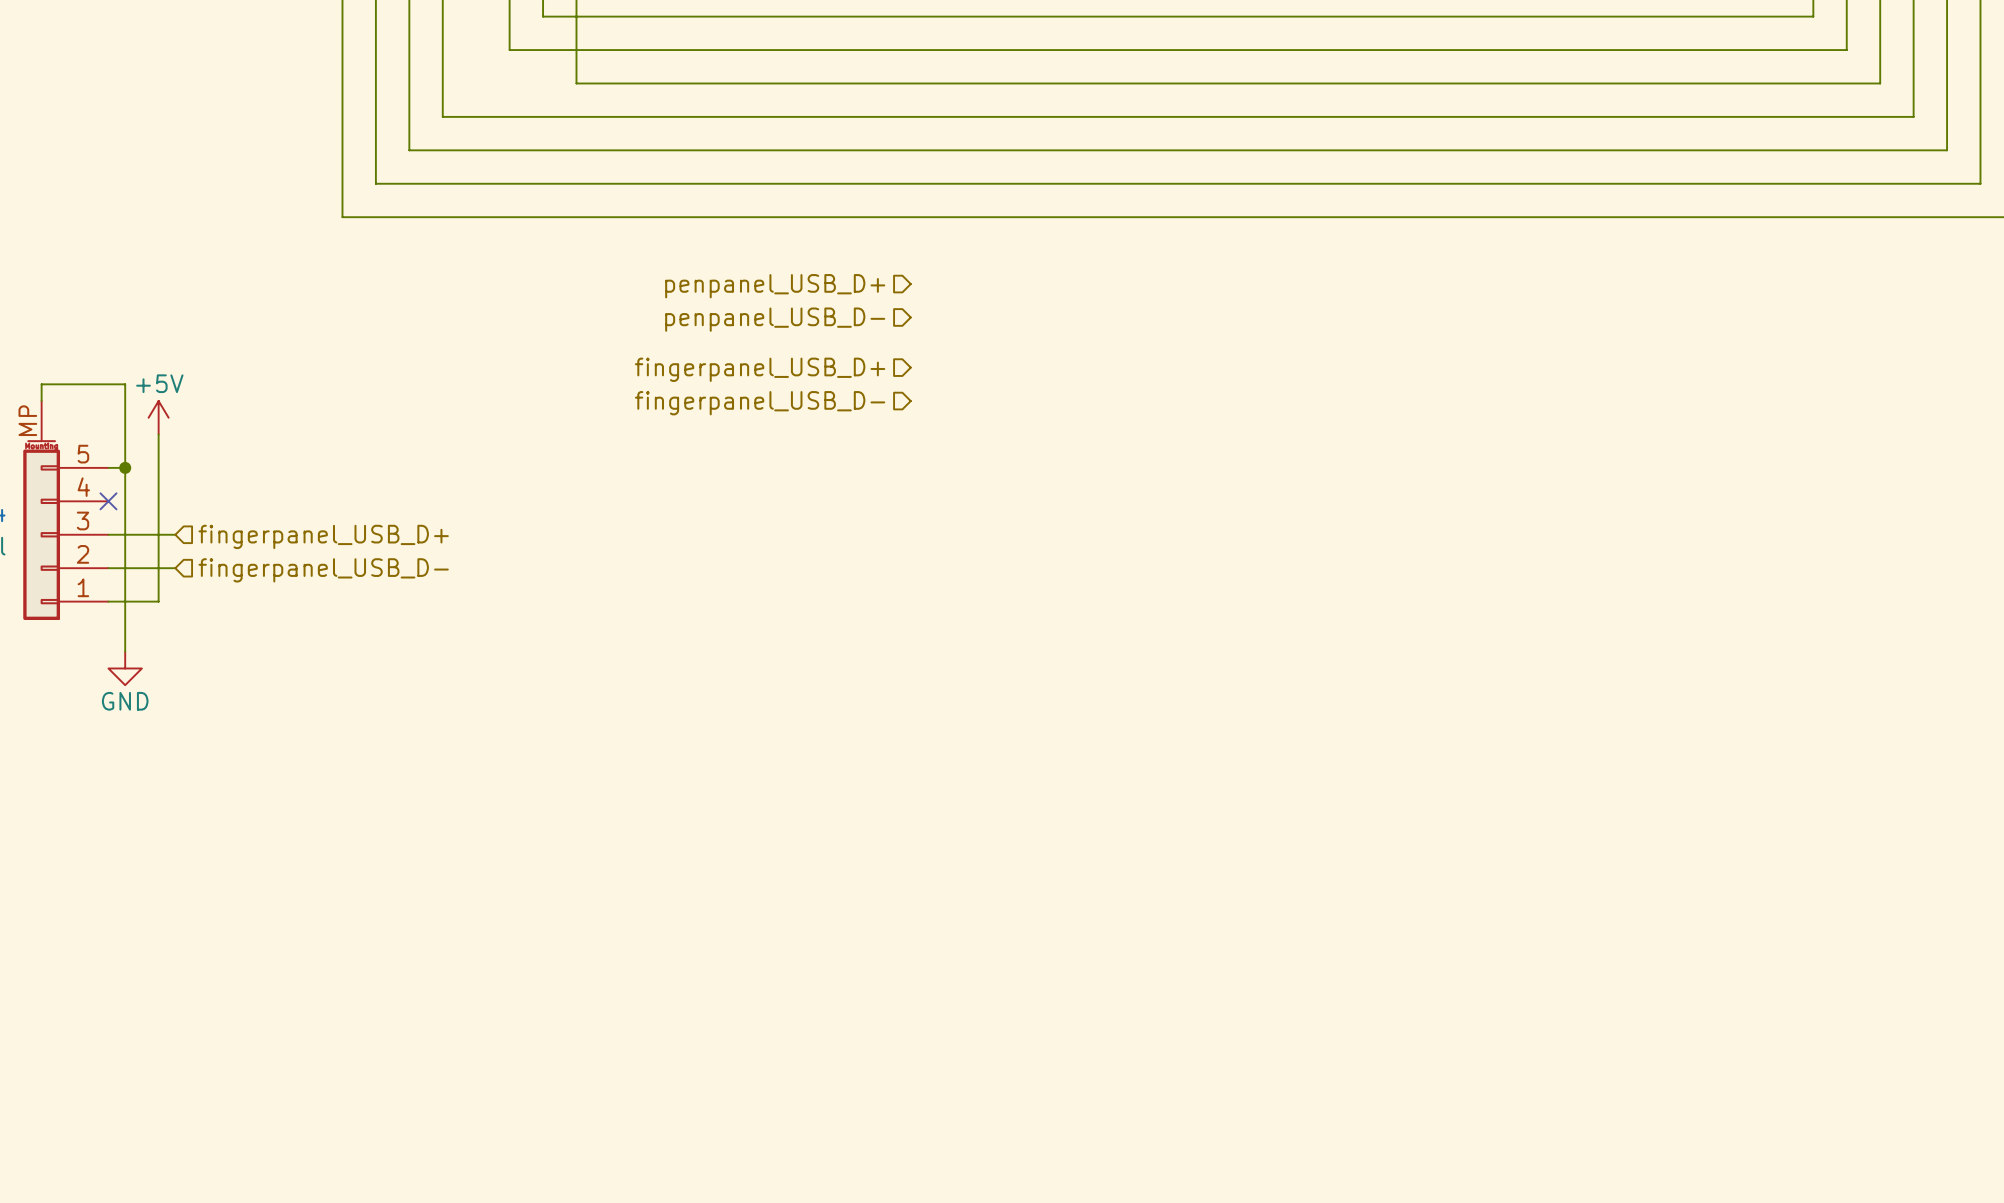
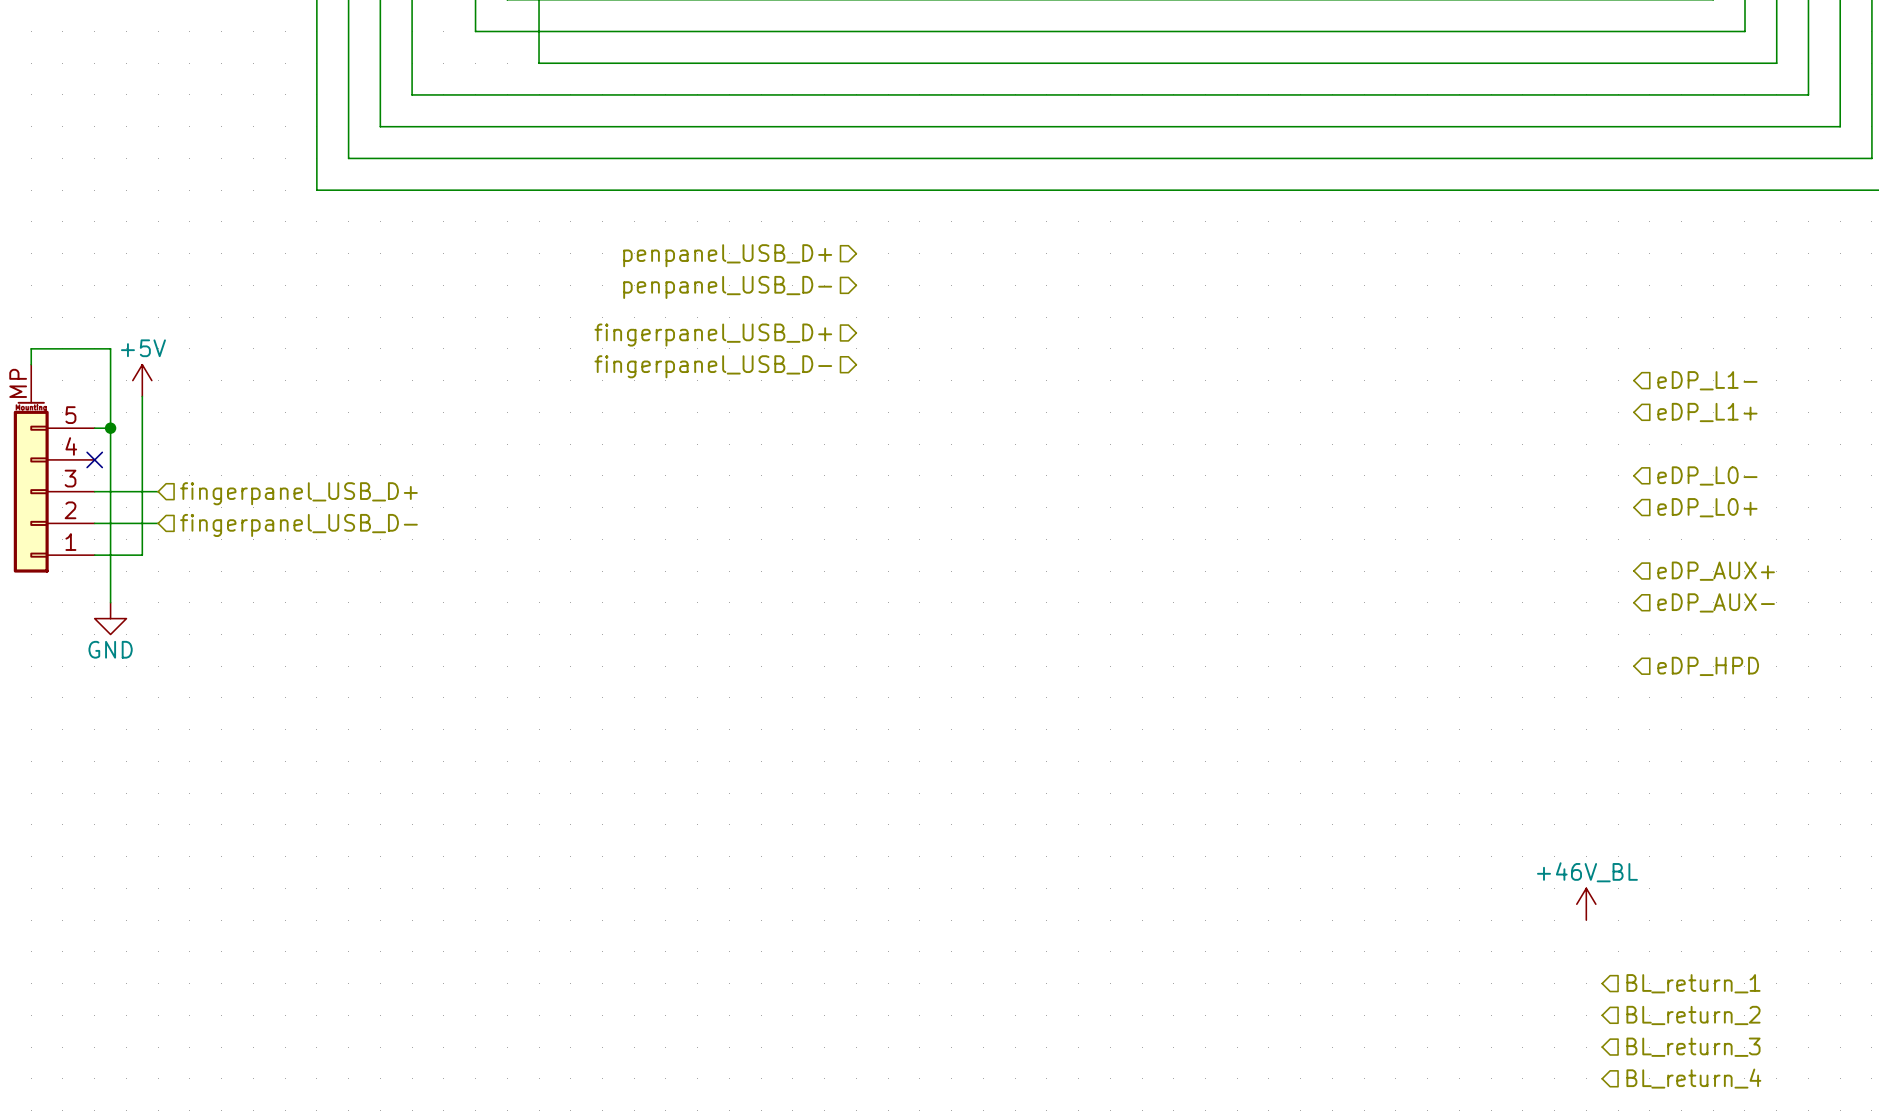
hierarchical label: none -> eDP_L1- (1707, 380)
hierarchical label: none -> eDP_L1+ (1707, 412)
hierarchical label: none -> eDP_L0- (1707, 475)
hierarchical label: none -> eDP_L0+ (1707, 507)
hierarchical label: none -> eDP_AUX+ (1716, 571)
hierarchical label: none -> eDP_AUX- (1716, 602)
hierarchical label: none -> eDP_HPD (1708, 666)
power symbol: none -> +46V_BL (1586, 904)
hierarchical label: none -> BL_return_1 (1693, 983)
hierarchical label: none -> BL_return_2 (1693, 1015)
hierarchical label: none -> BL_return_3 (1693, 1047)
hierarchical label: none -> BL_return_4 (1693, 1078)

